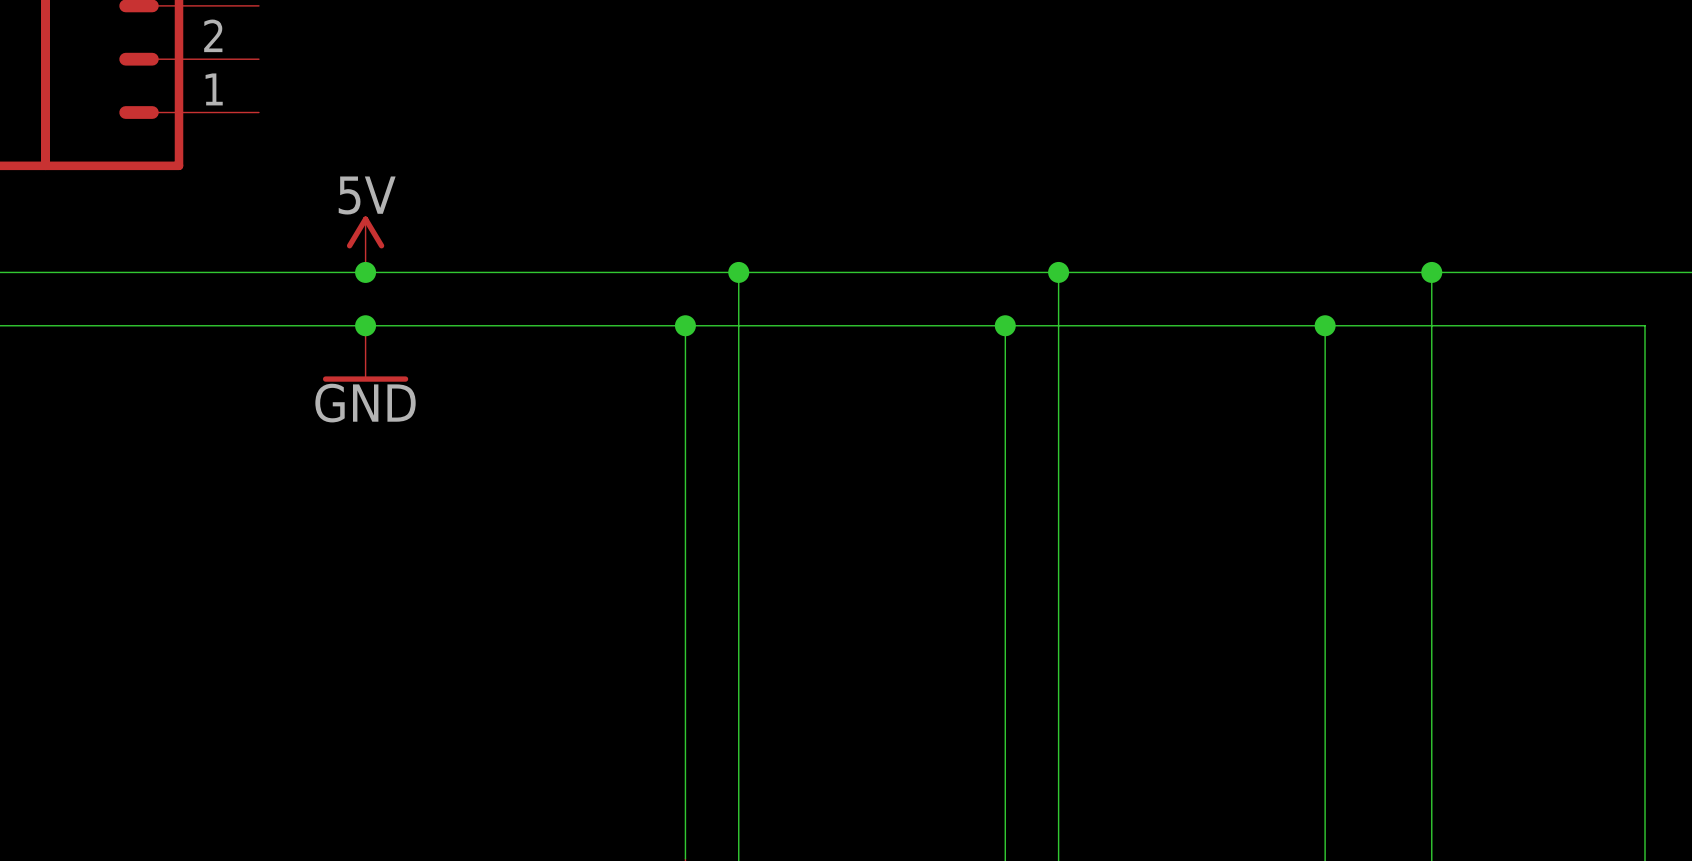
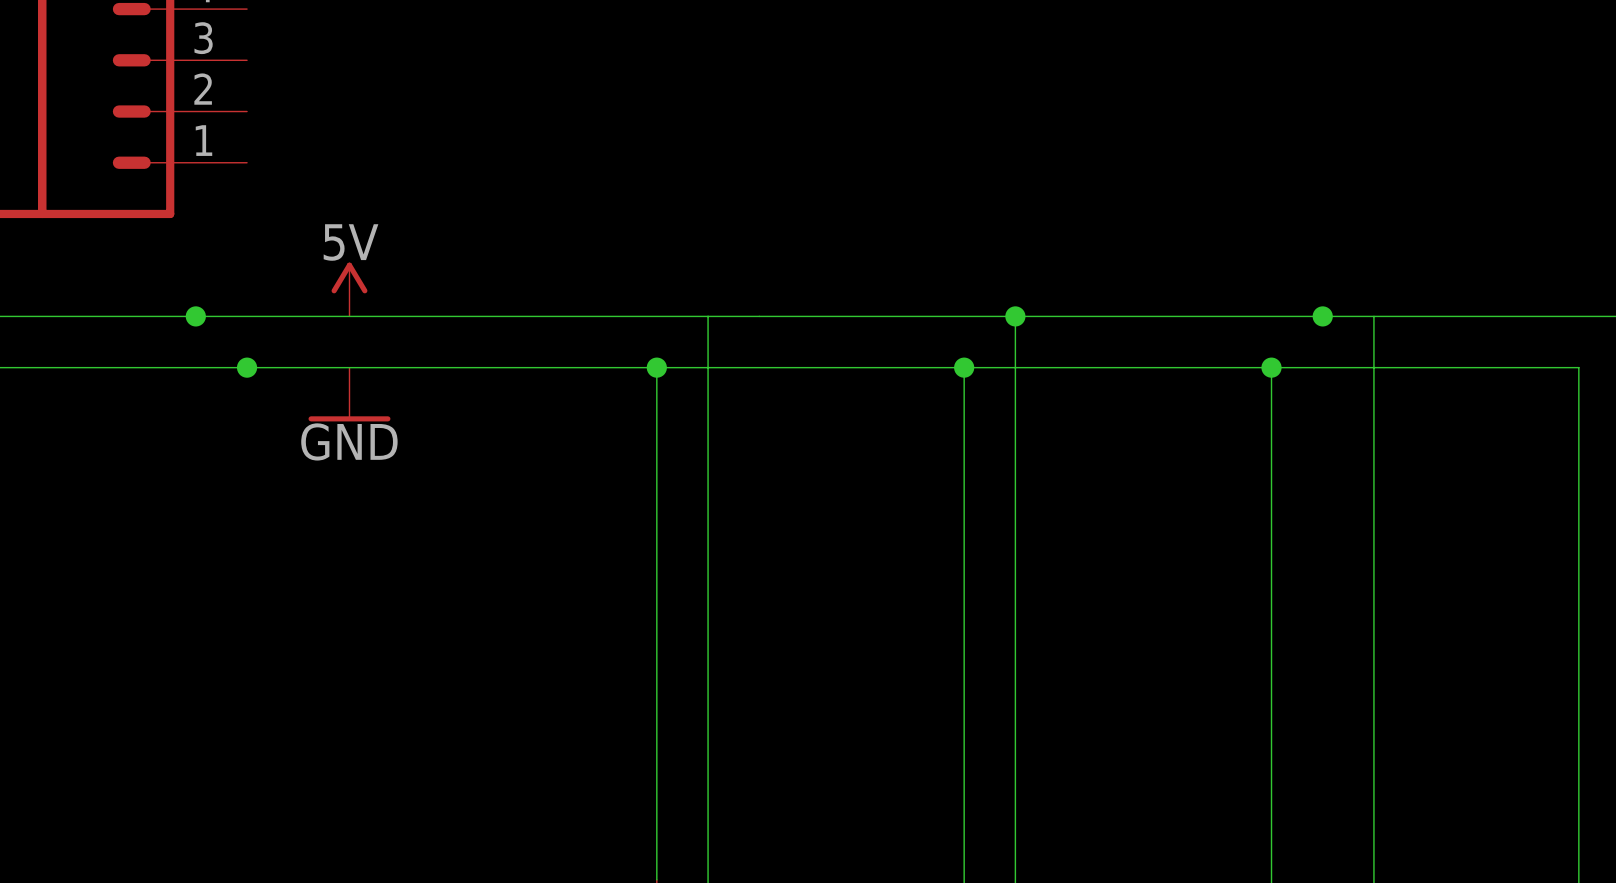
junction: none -> (195, 316)
junction: (365, 272) -> none
junction: (738, 272) -> none
junction position: (1431, 272) -> (1322, 316)
junction: none -> (247, 367)
junction: (365, 325) -> none

